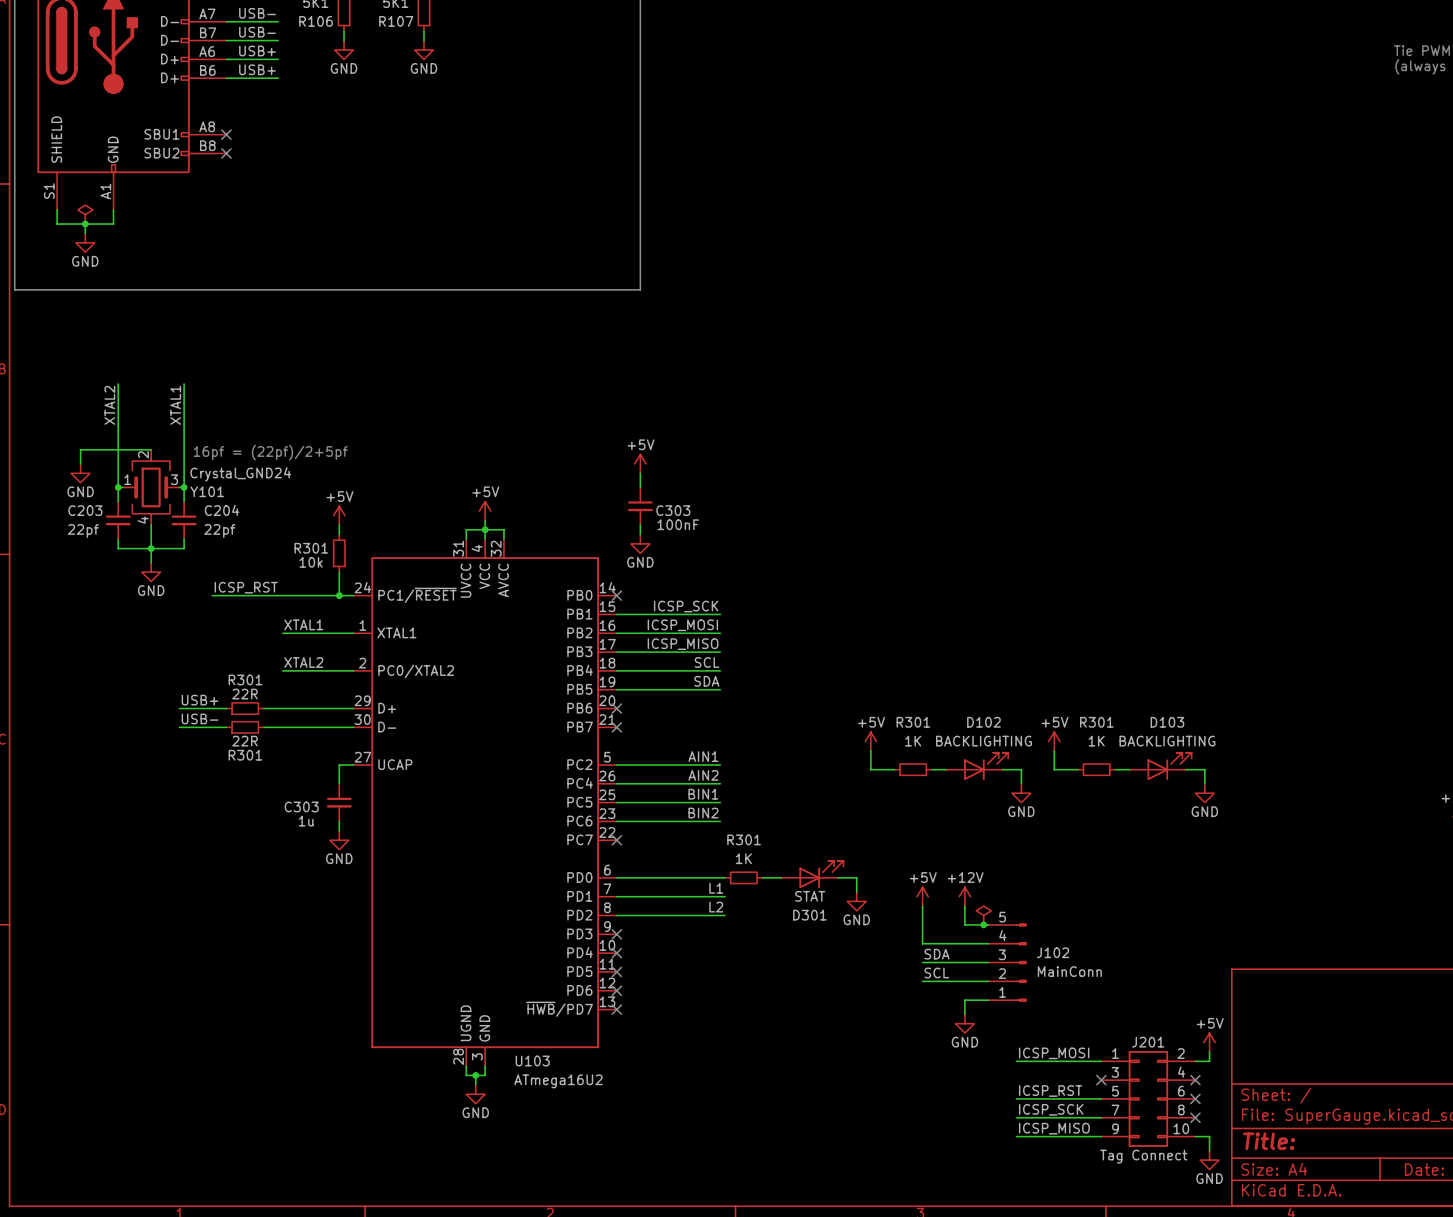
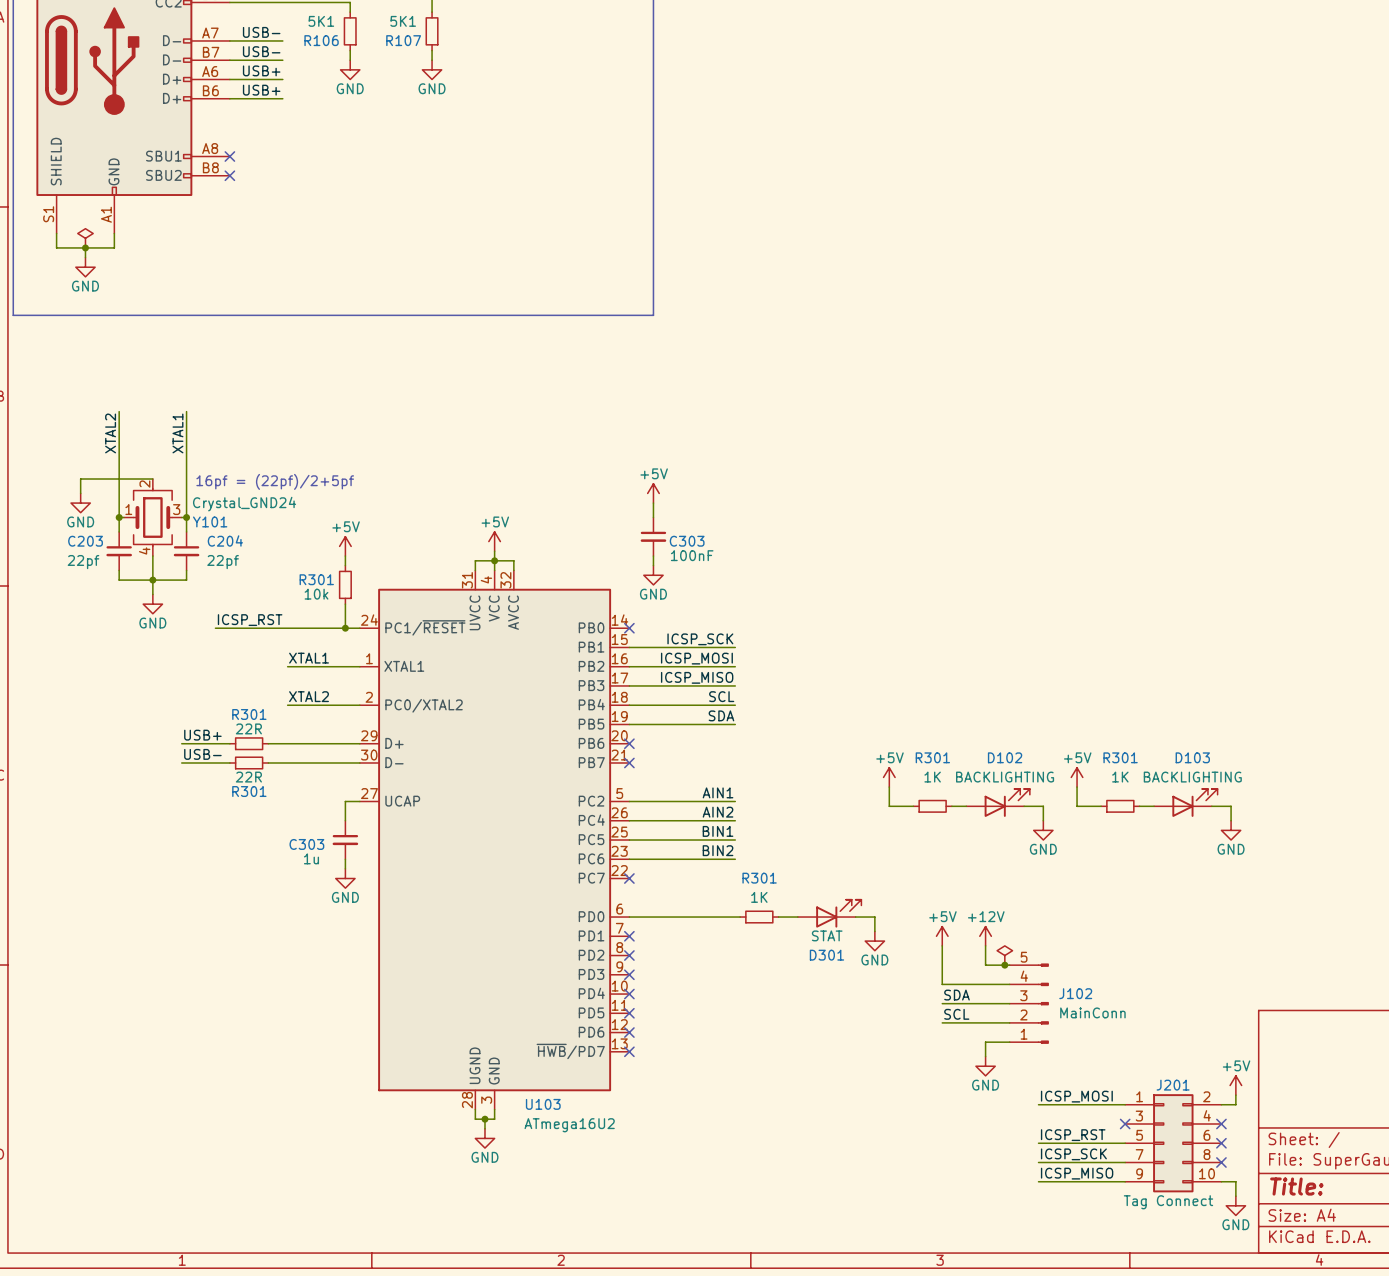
label: L1 (716, 888) -> none
wire: (616, 896) (725, 896) -> none
no-connect mark: none -> (629, 936)
label: L2 (716, 907) -> none
wire: (616, 915) (725, 915) -> none
no-connect mark: none -> (629, 955)

